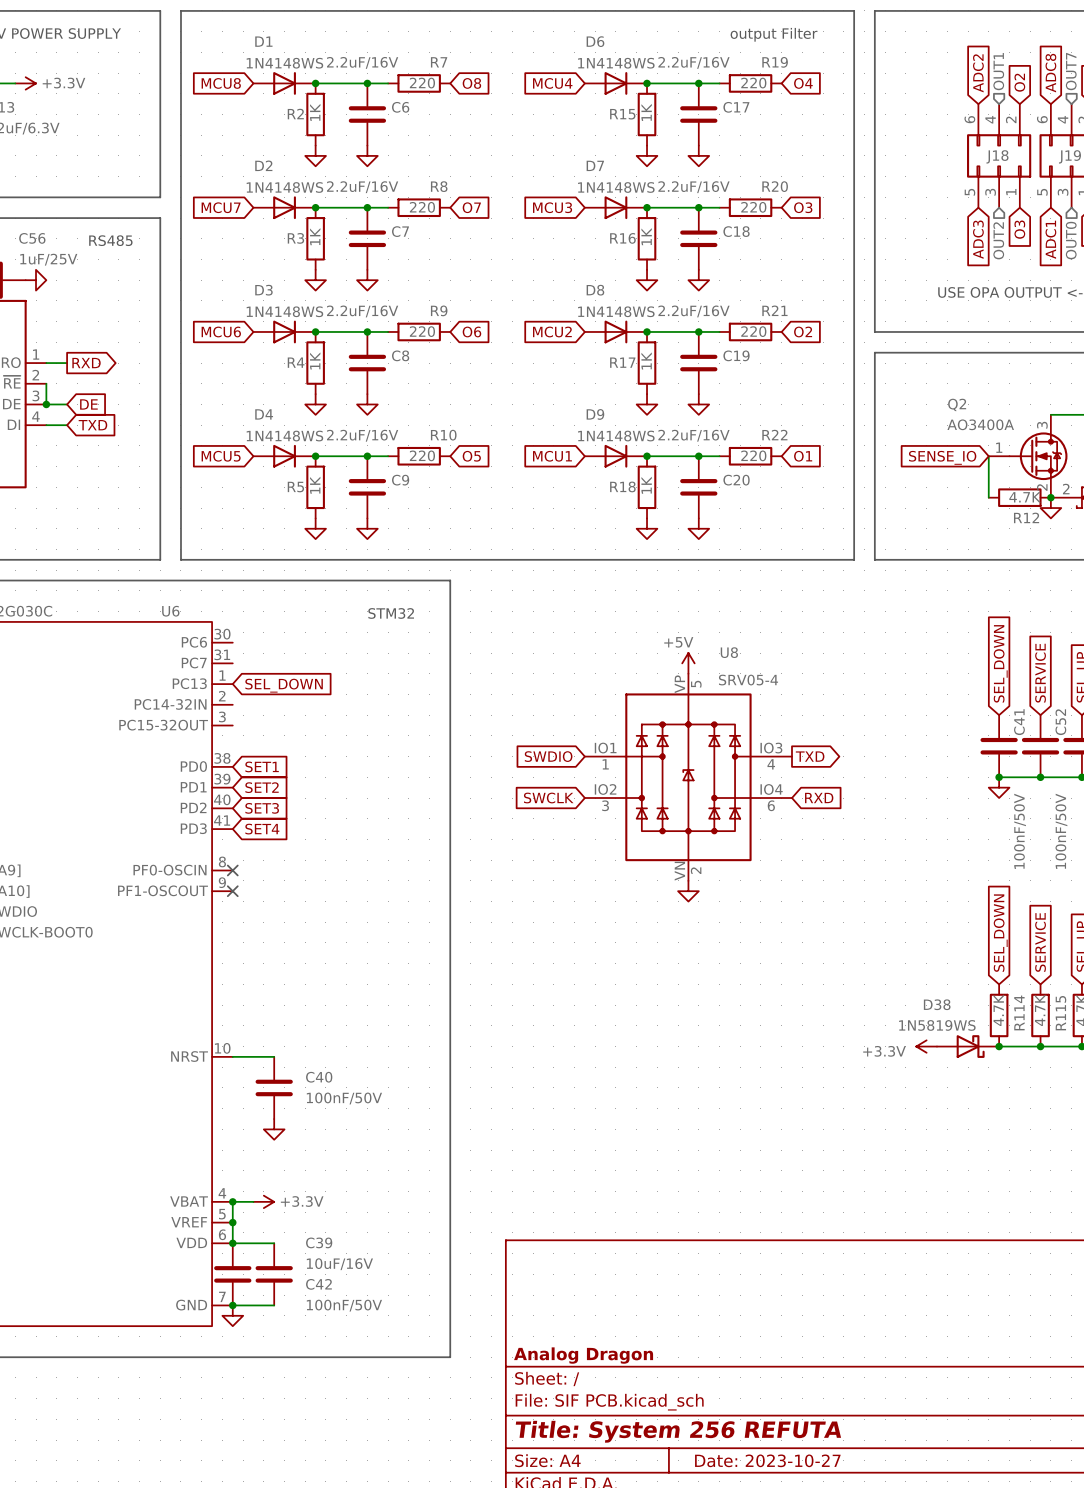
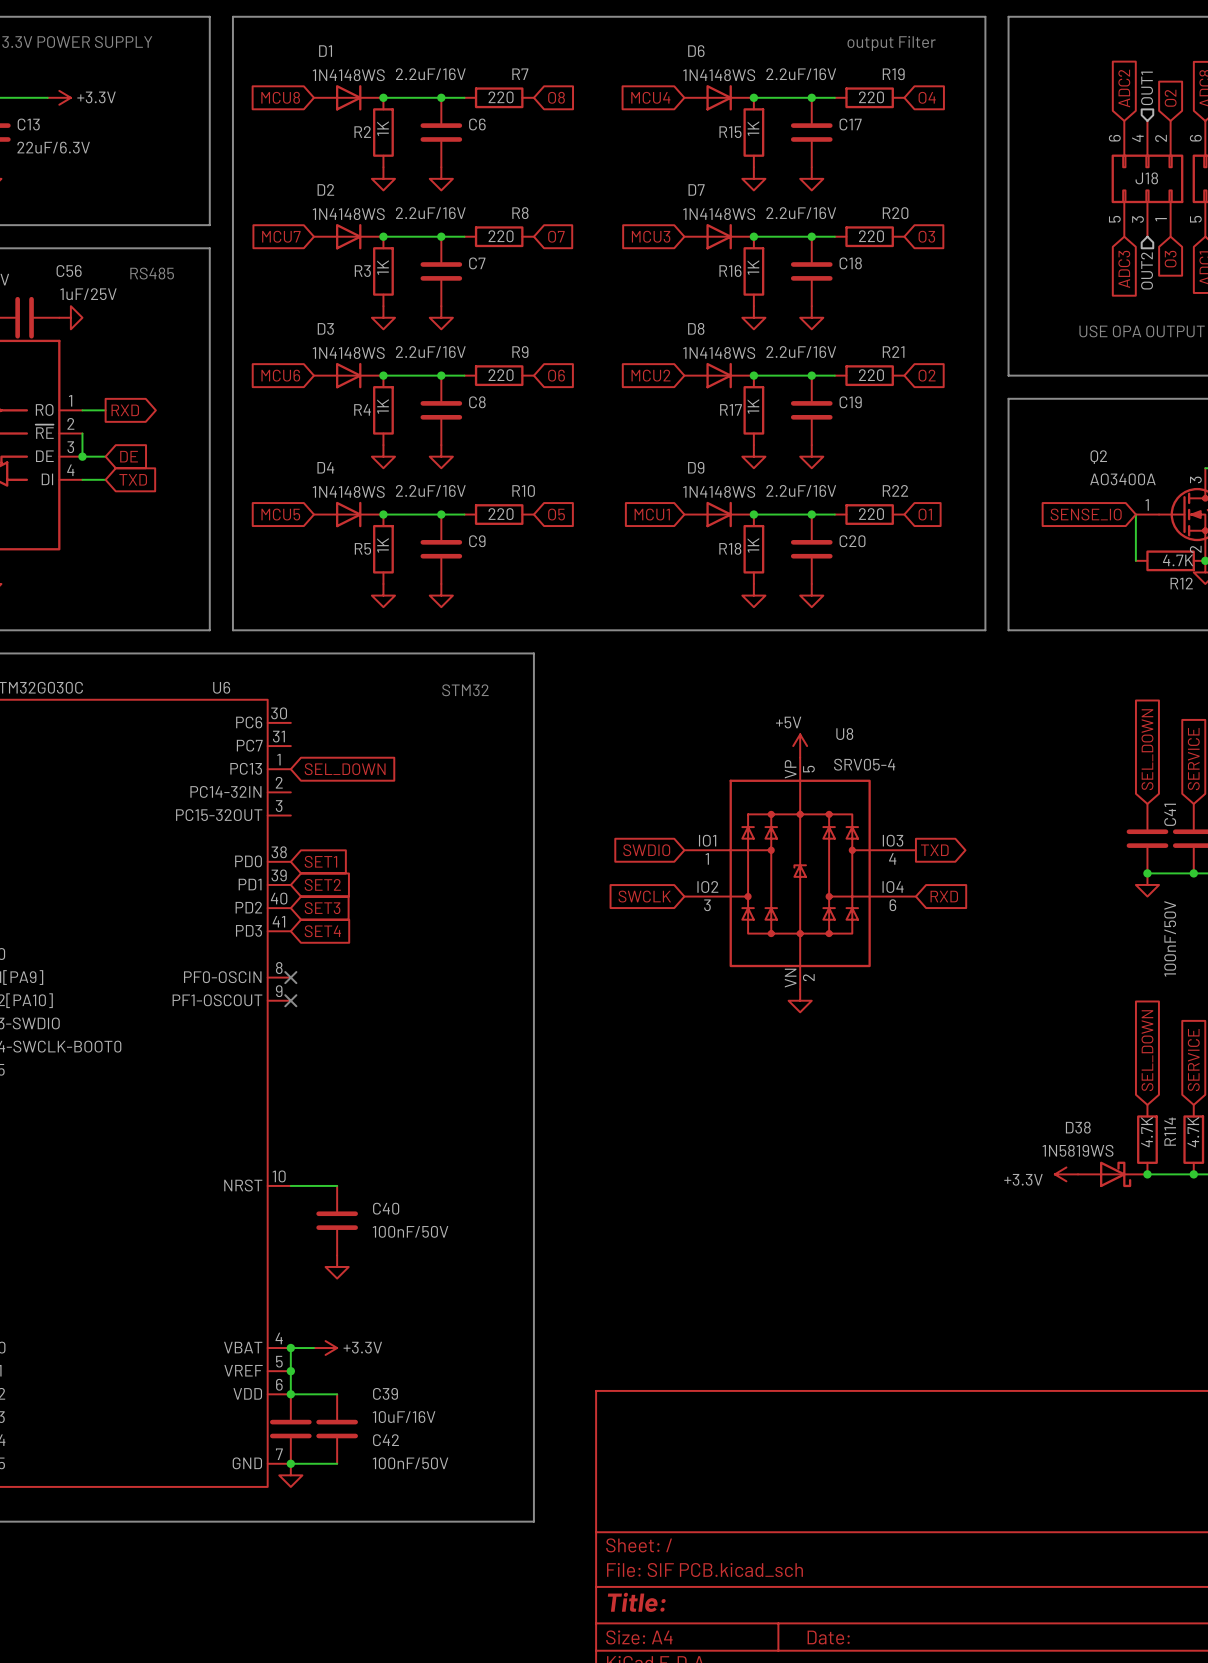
title block: Analog Dragon (583, 1355) -> none
title block: Title: System 256 REFUTA (678, 1431) -> Title: (636, 1602)
title block: Date: 2023-10-27 (767, 1460) -> Date: (828, 1637)

